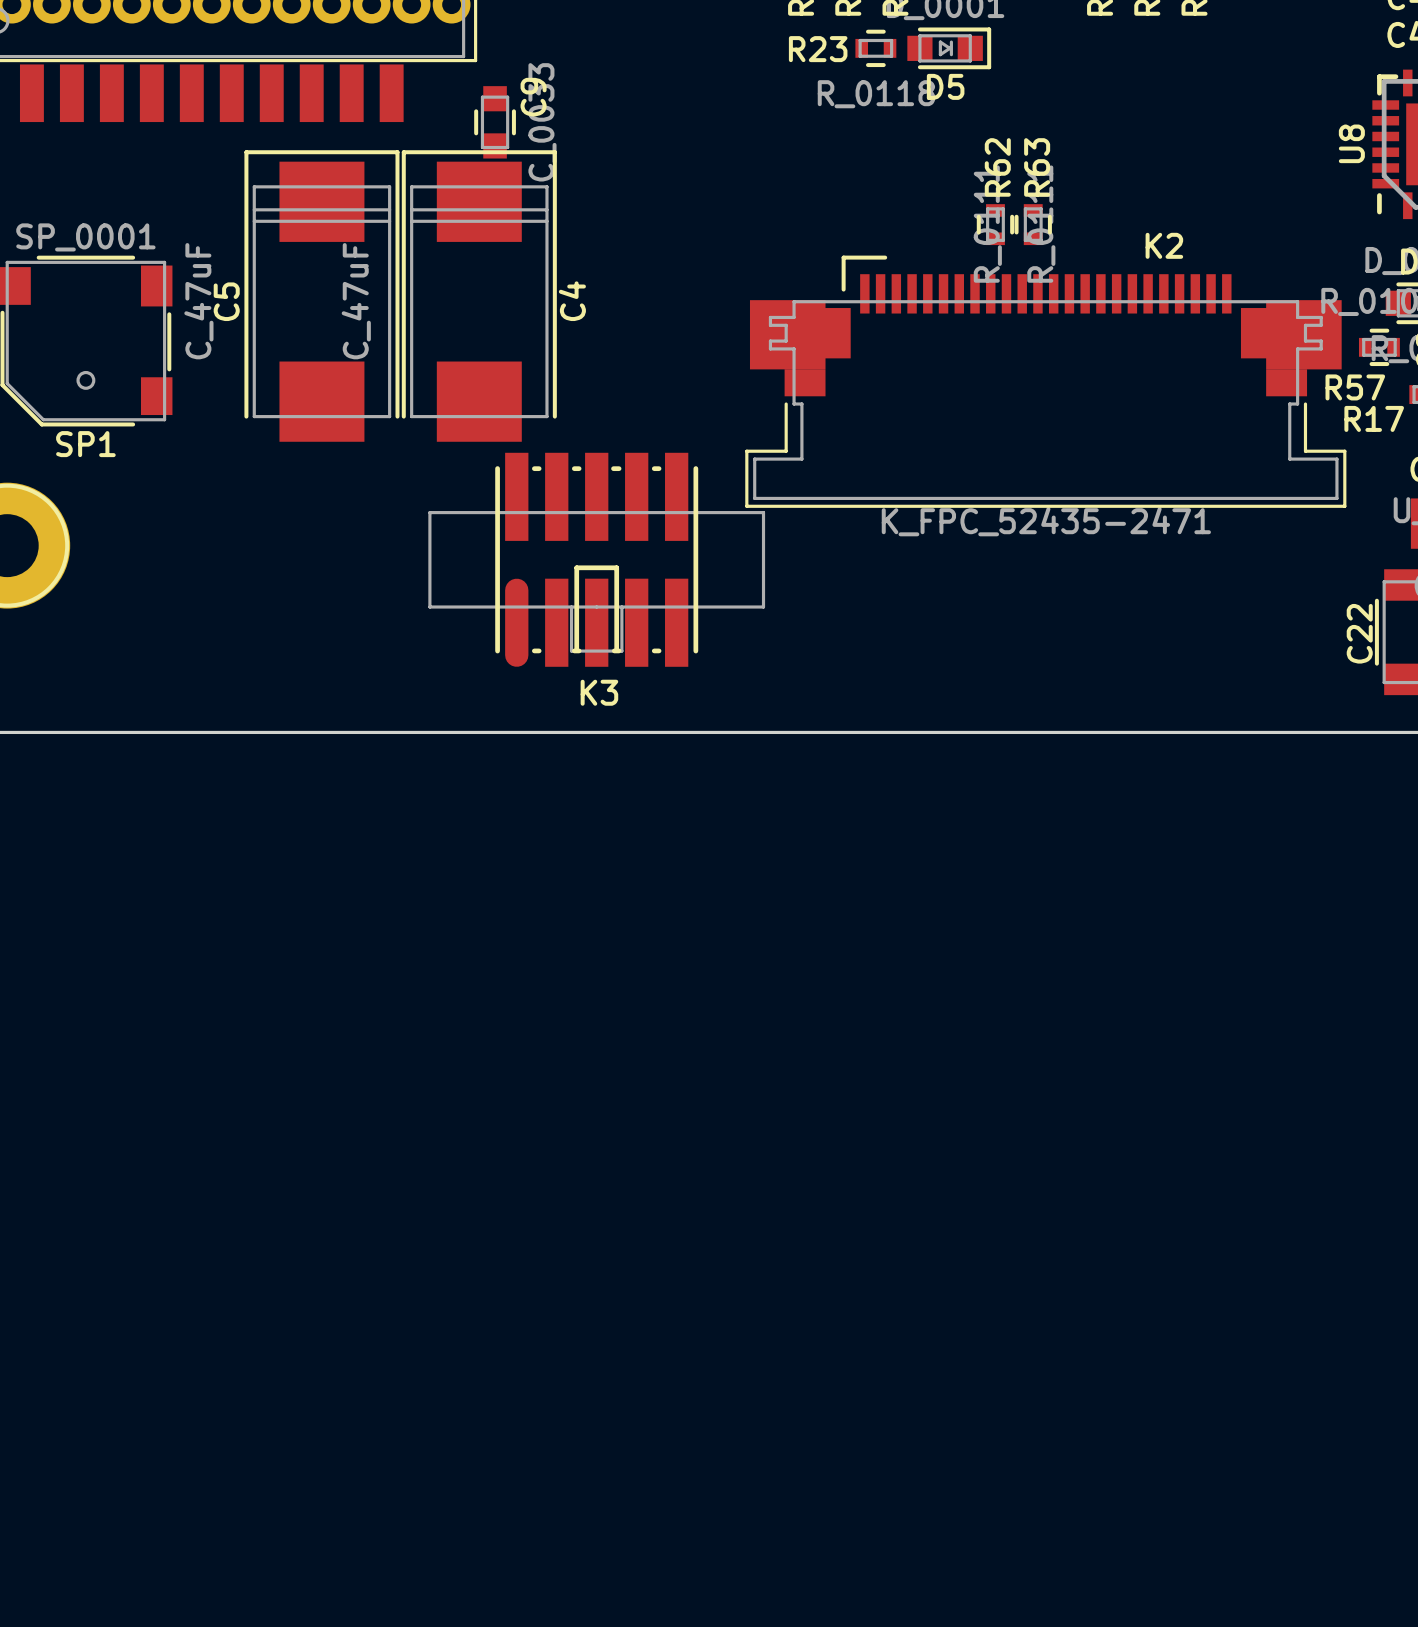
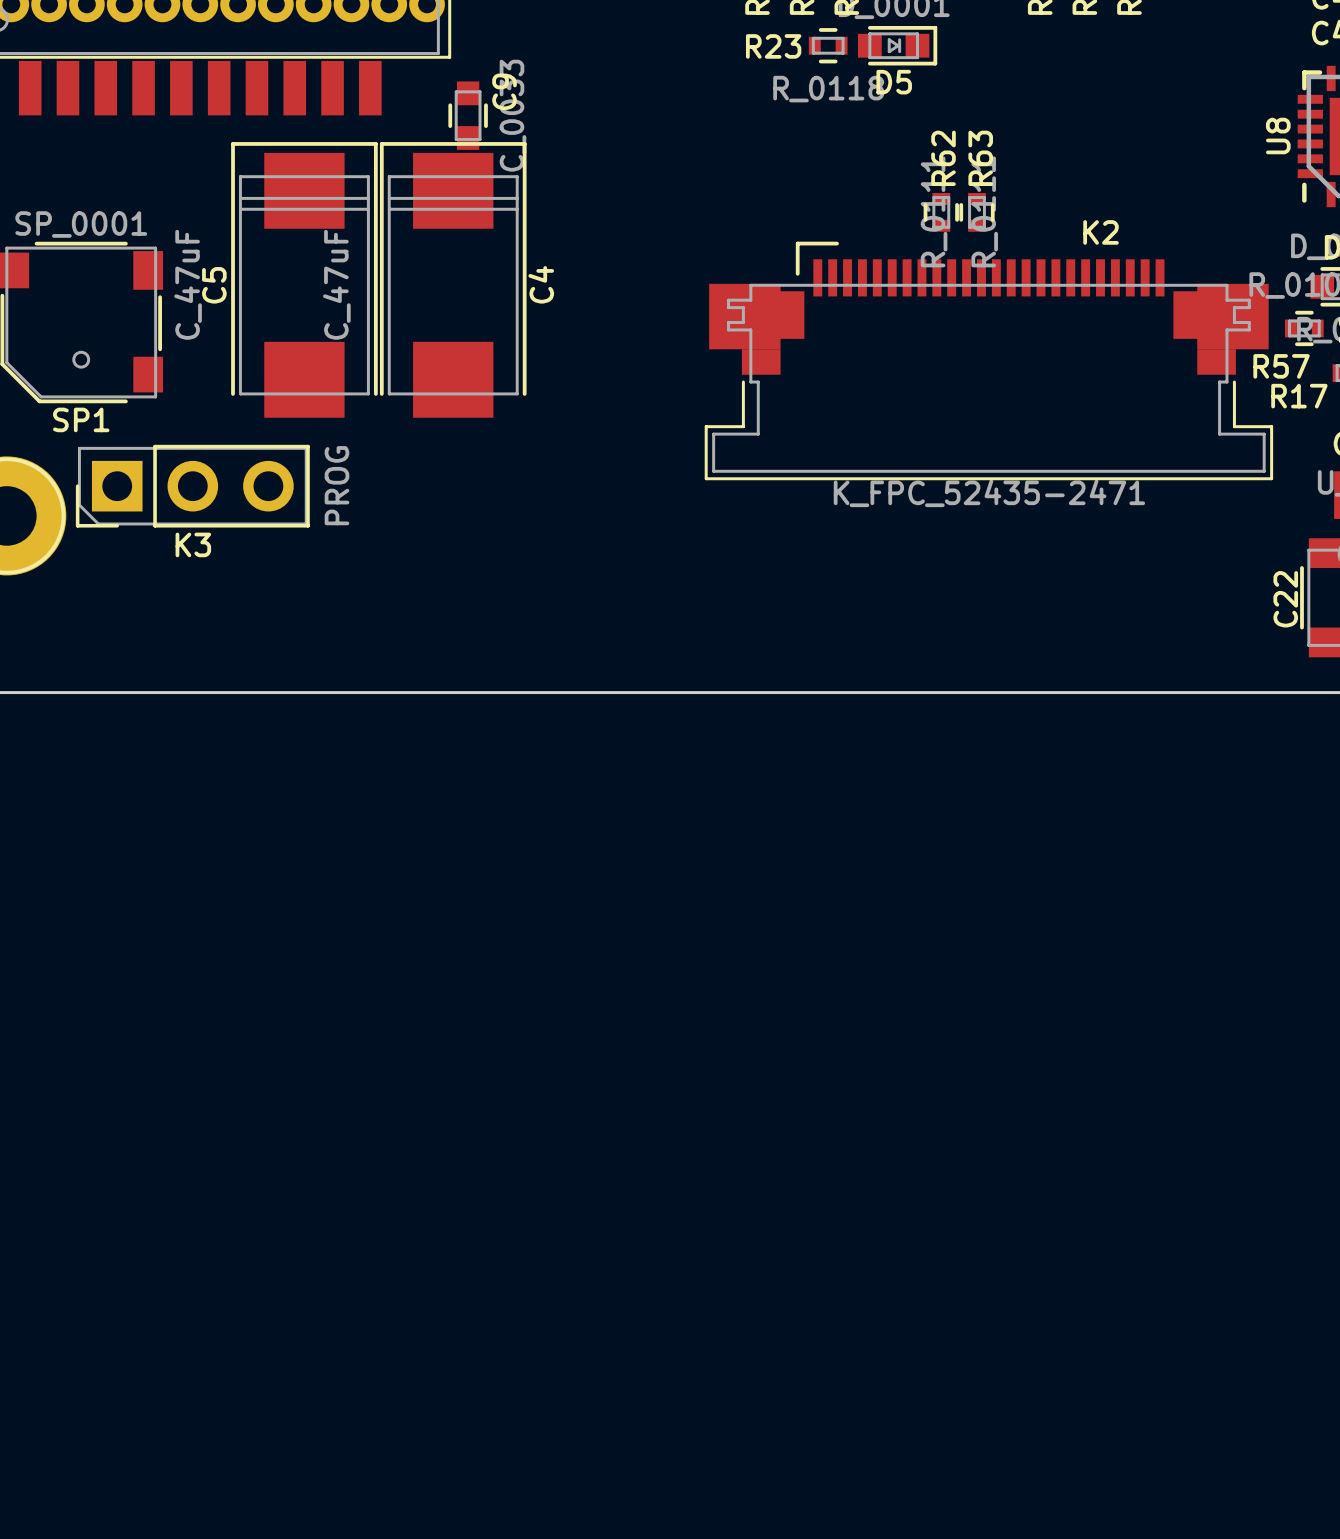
K3 footprint: [428, 452, 766, 667] -> [75, 444, 310, 528]
K3 value: none -> PROG (336, 485)
K3 name position: K3 (599, 692) -> K3 (193, 544)

